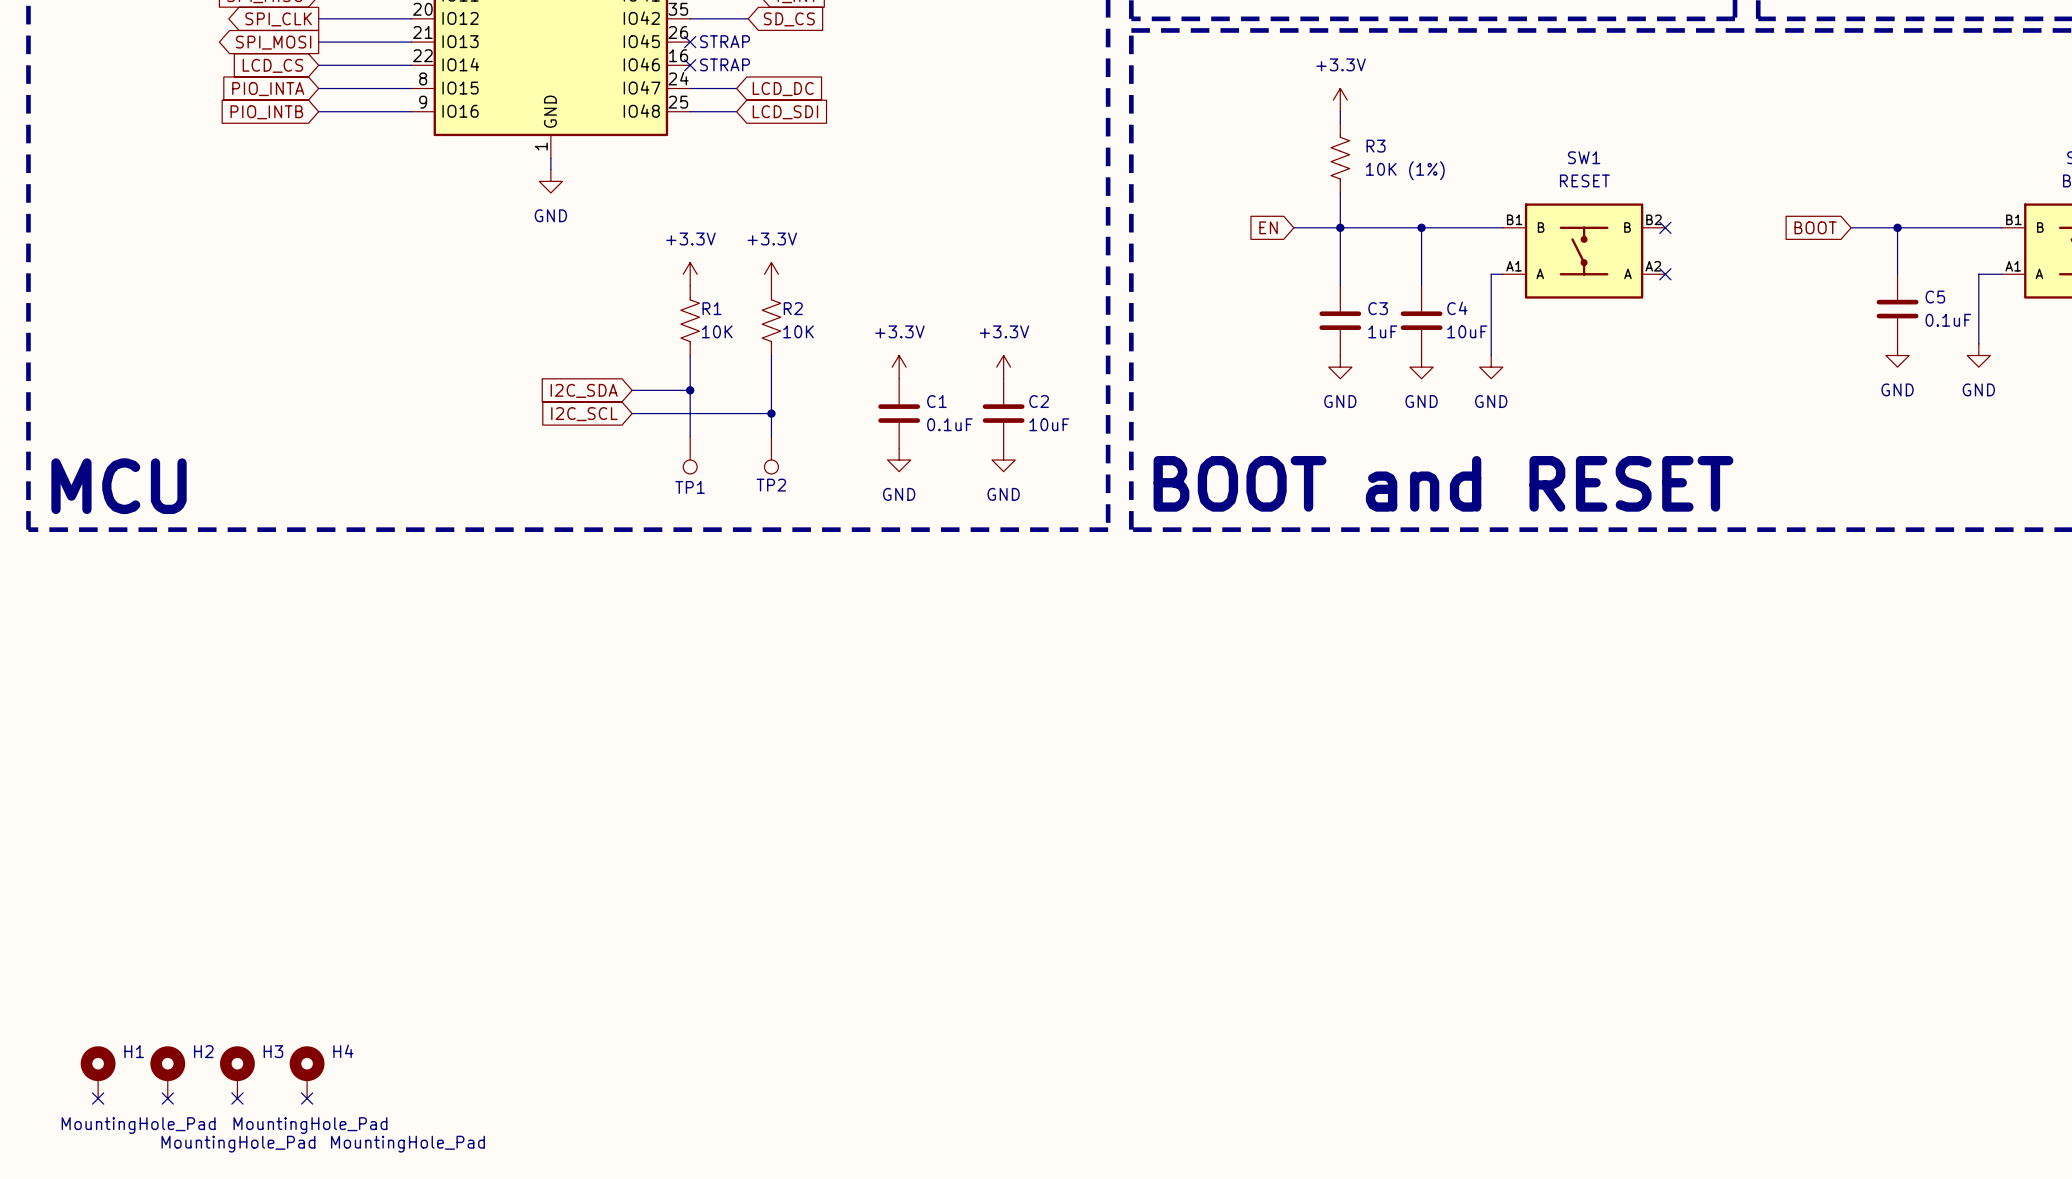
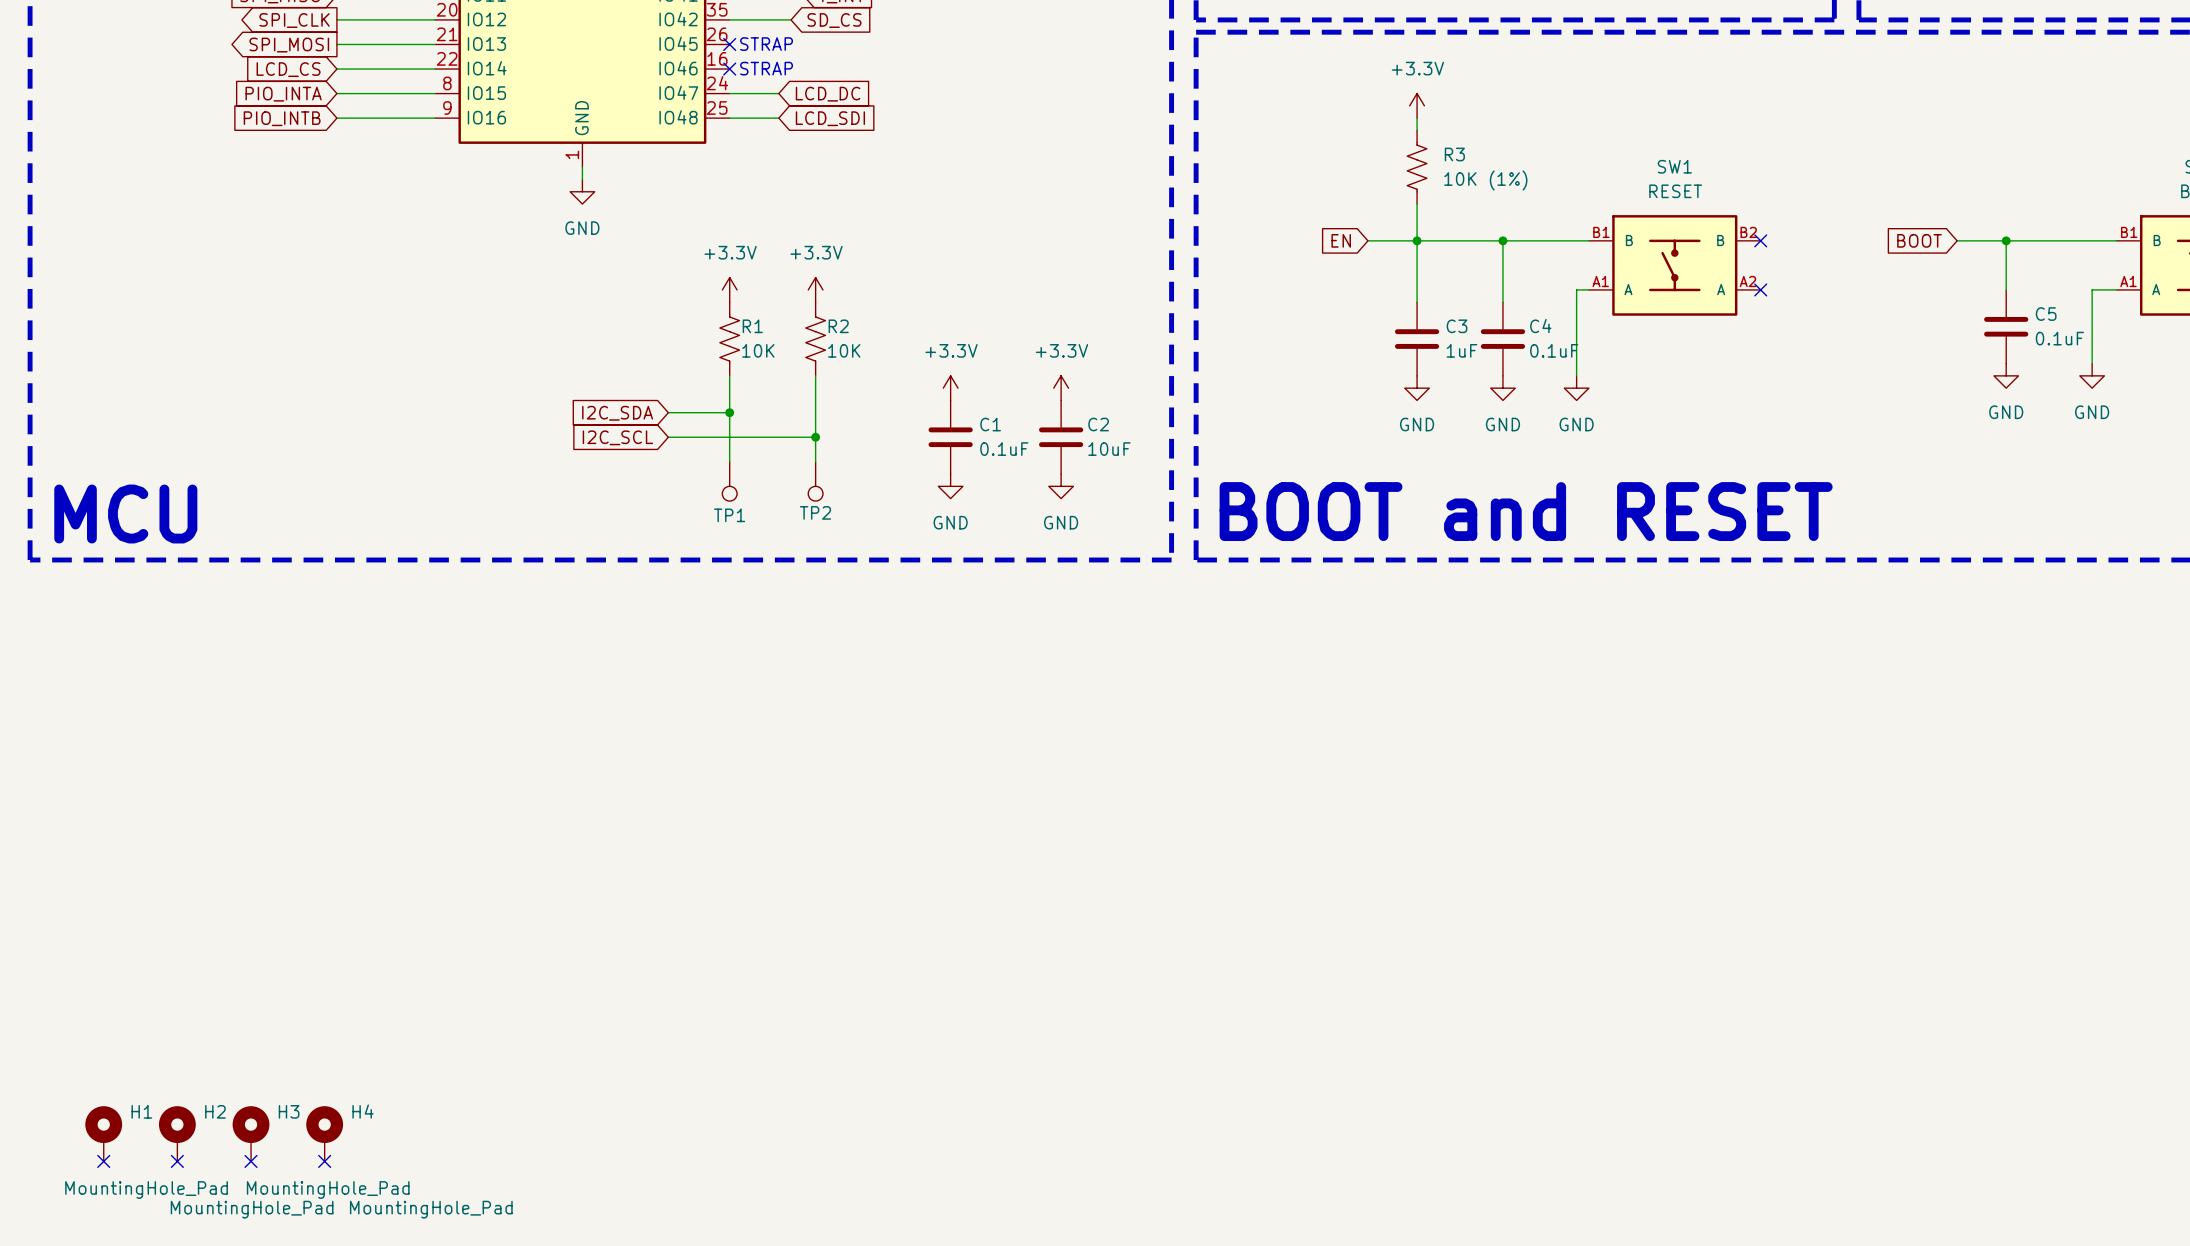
C4 value: 10uF (1467, 331) -> 0.1uF (1554, 350)

